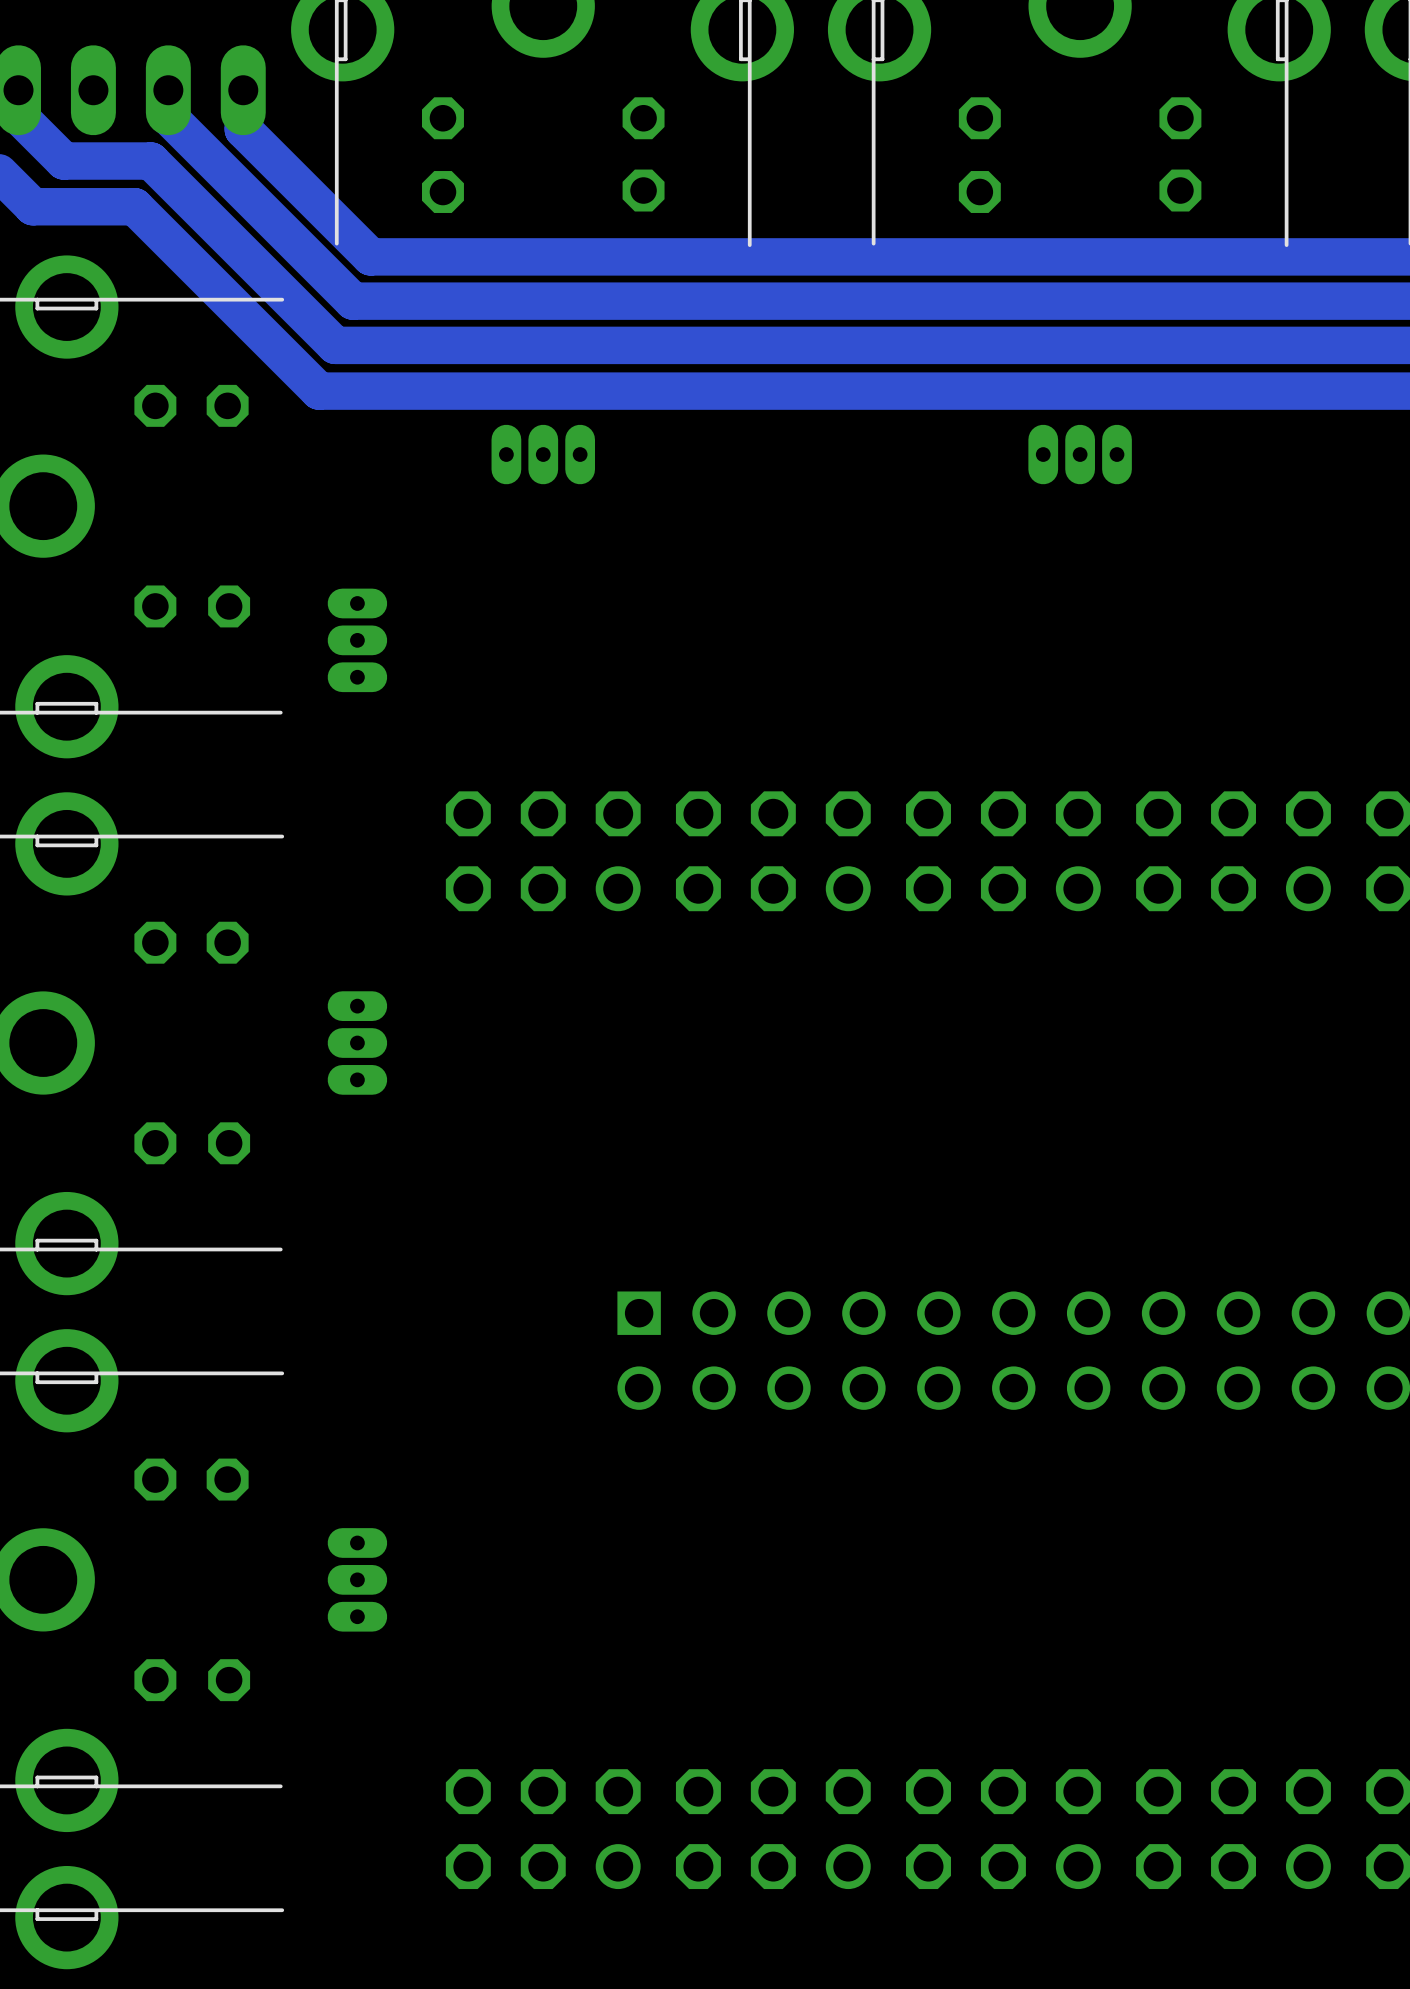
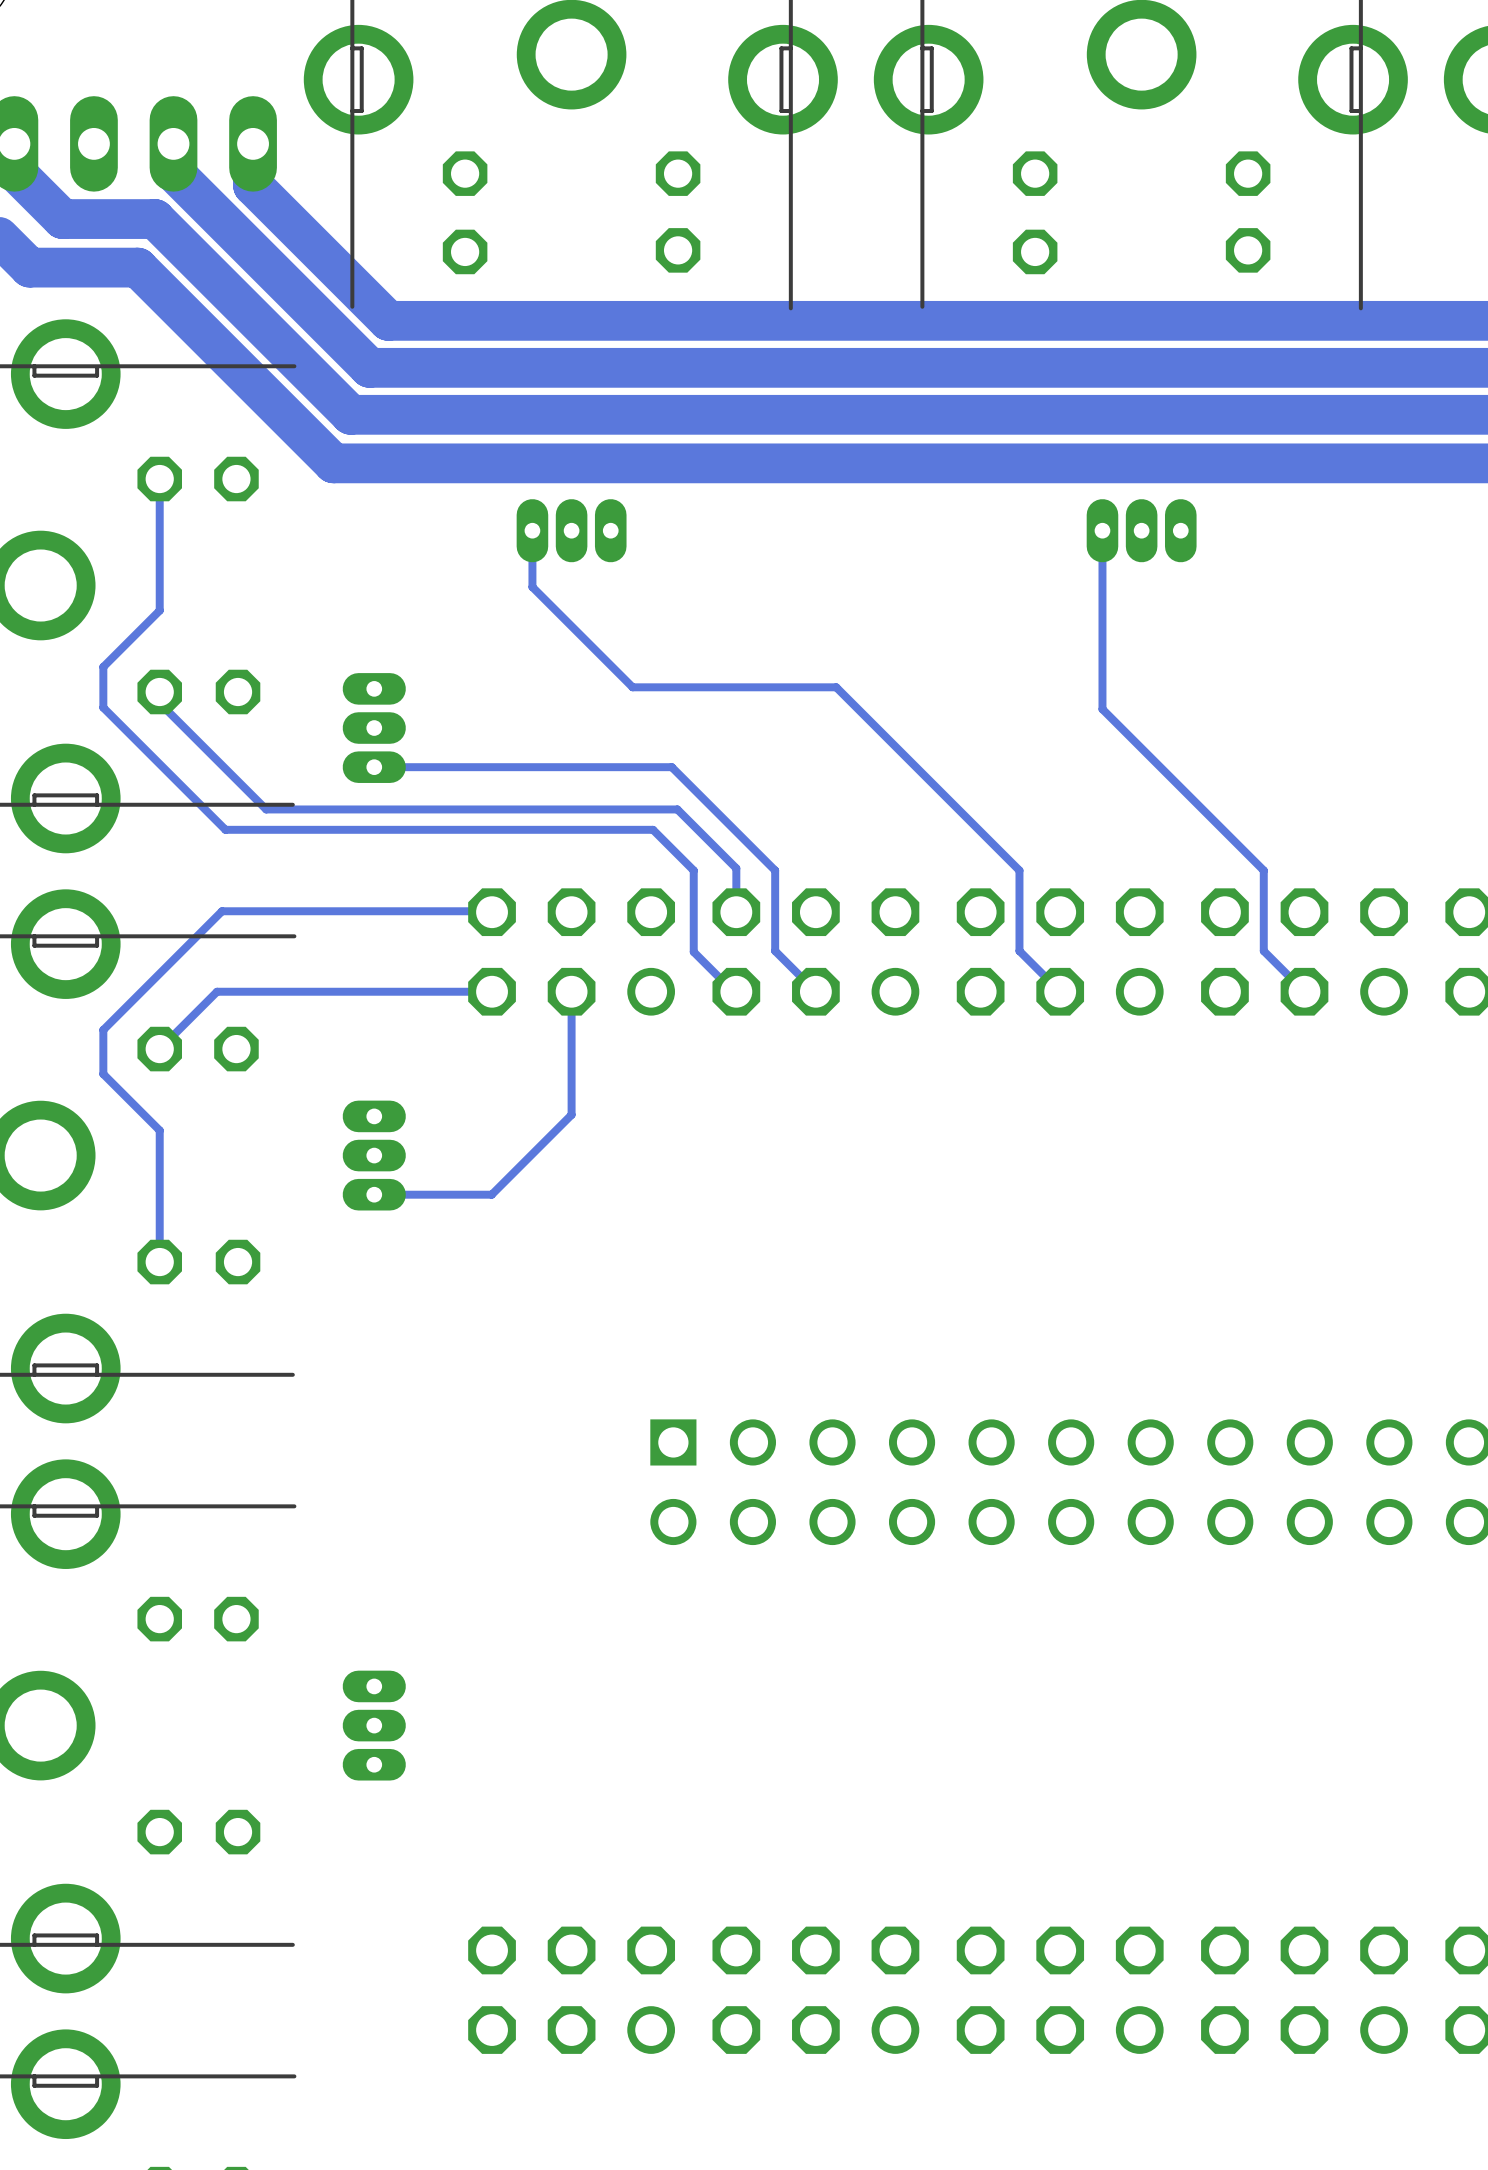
track: none -> (159, 479) (159, 610) (103, 666) (103, 707) (225, 829) (653, 829) (693, 870) (693, 951) (733, 991) (736, 991)
track: none -> (532, 530) (532, 587) (632, 687) (836, 687) (1019, 870) (1019, 951) (1060, 991)
track: none -> (1102, 530) (1102, 709) (1263, 870) (1263, 951) (1304, 991)
track: none -> (159, 692) (159, 702) (266, 809) (677, 809) (736, 868) (736, 912)
track: none -> (374, 767) (671, 767) (775, 870) (775, 951) (815, 991)
track: none -> (492, 912) (222, 911) (103, 1029) (103, 1074) (159, 1130) (159, 1262)
track: none -> (492, 991) (217, 991) (159, 1049)
track: none -> (571, 991) (571, 1114) (491, 1194) (374, 1194)

